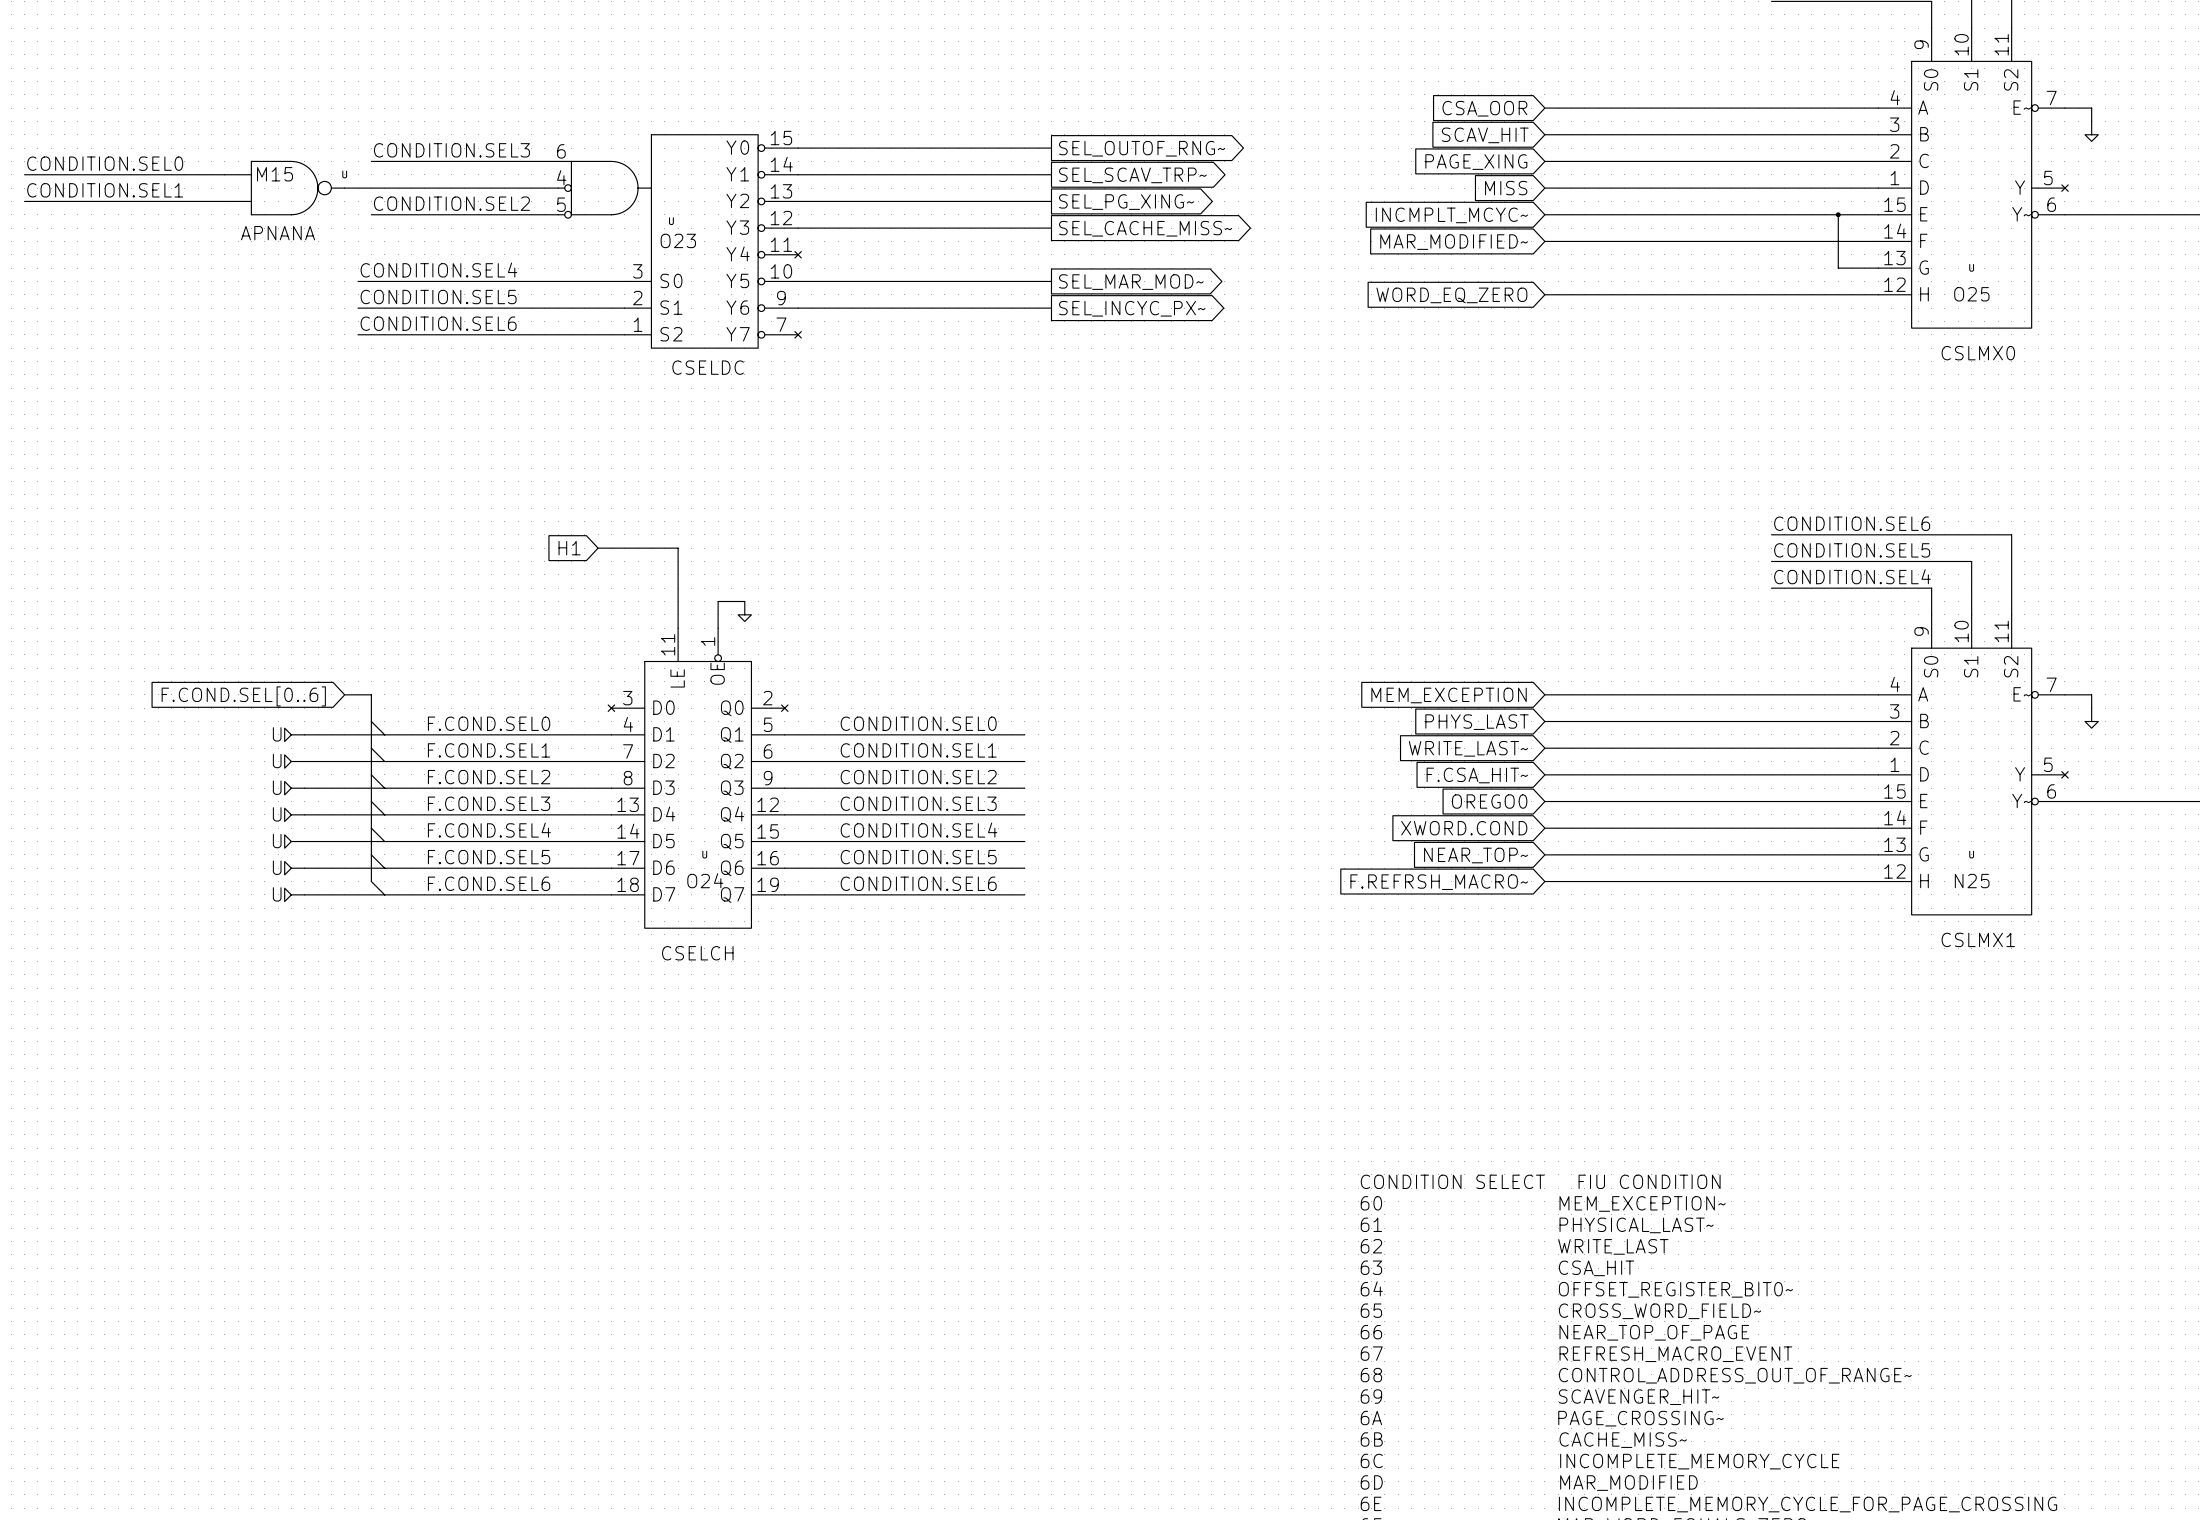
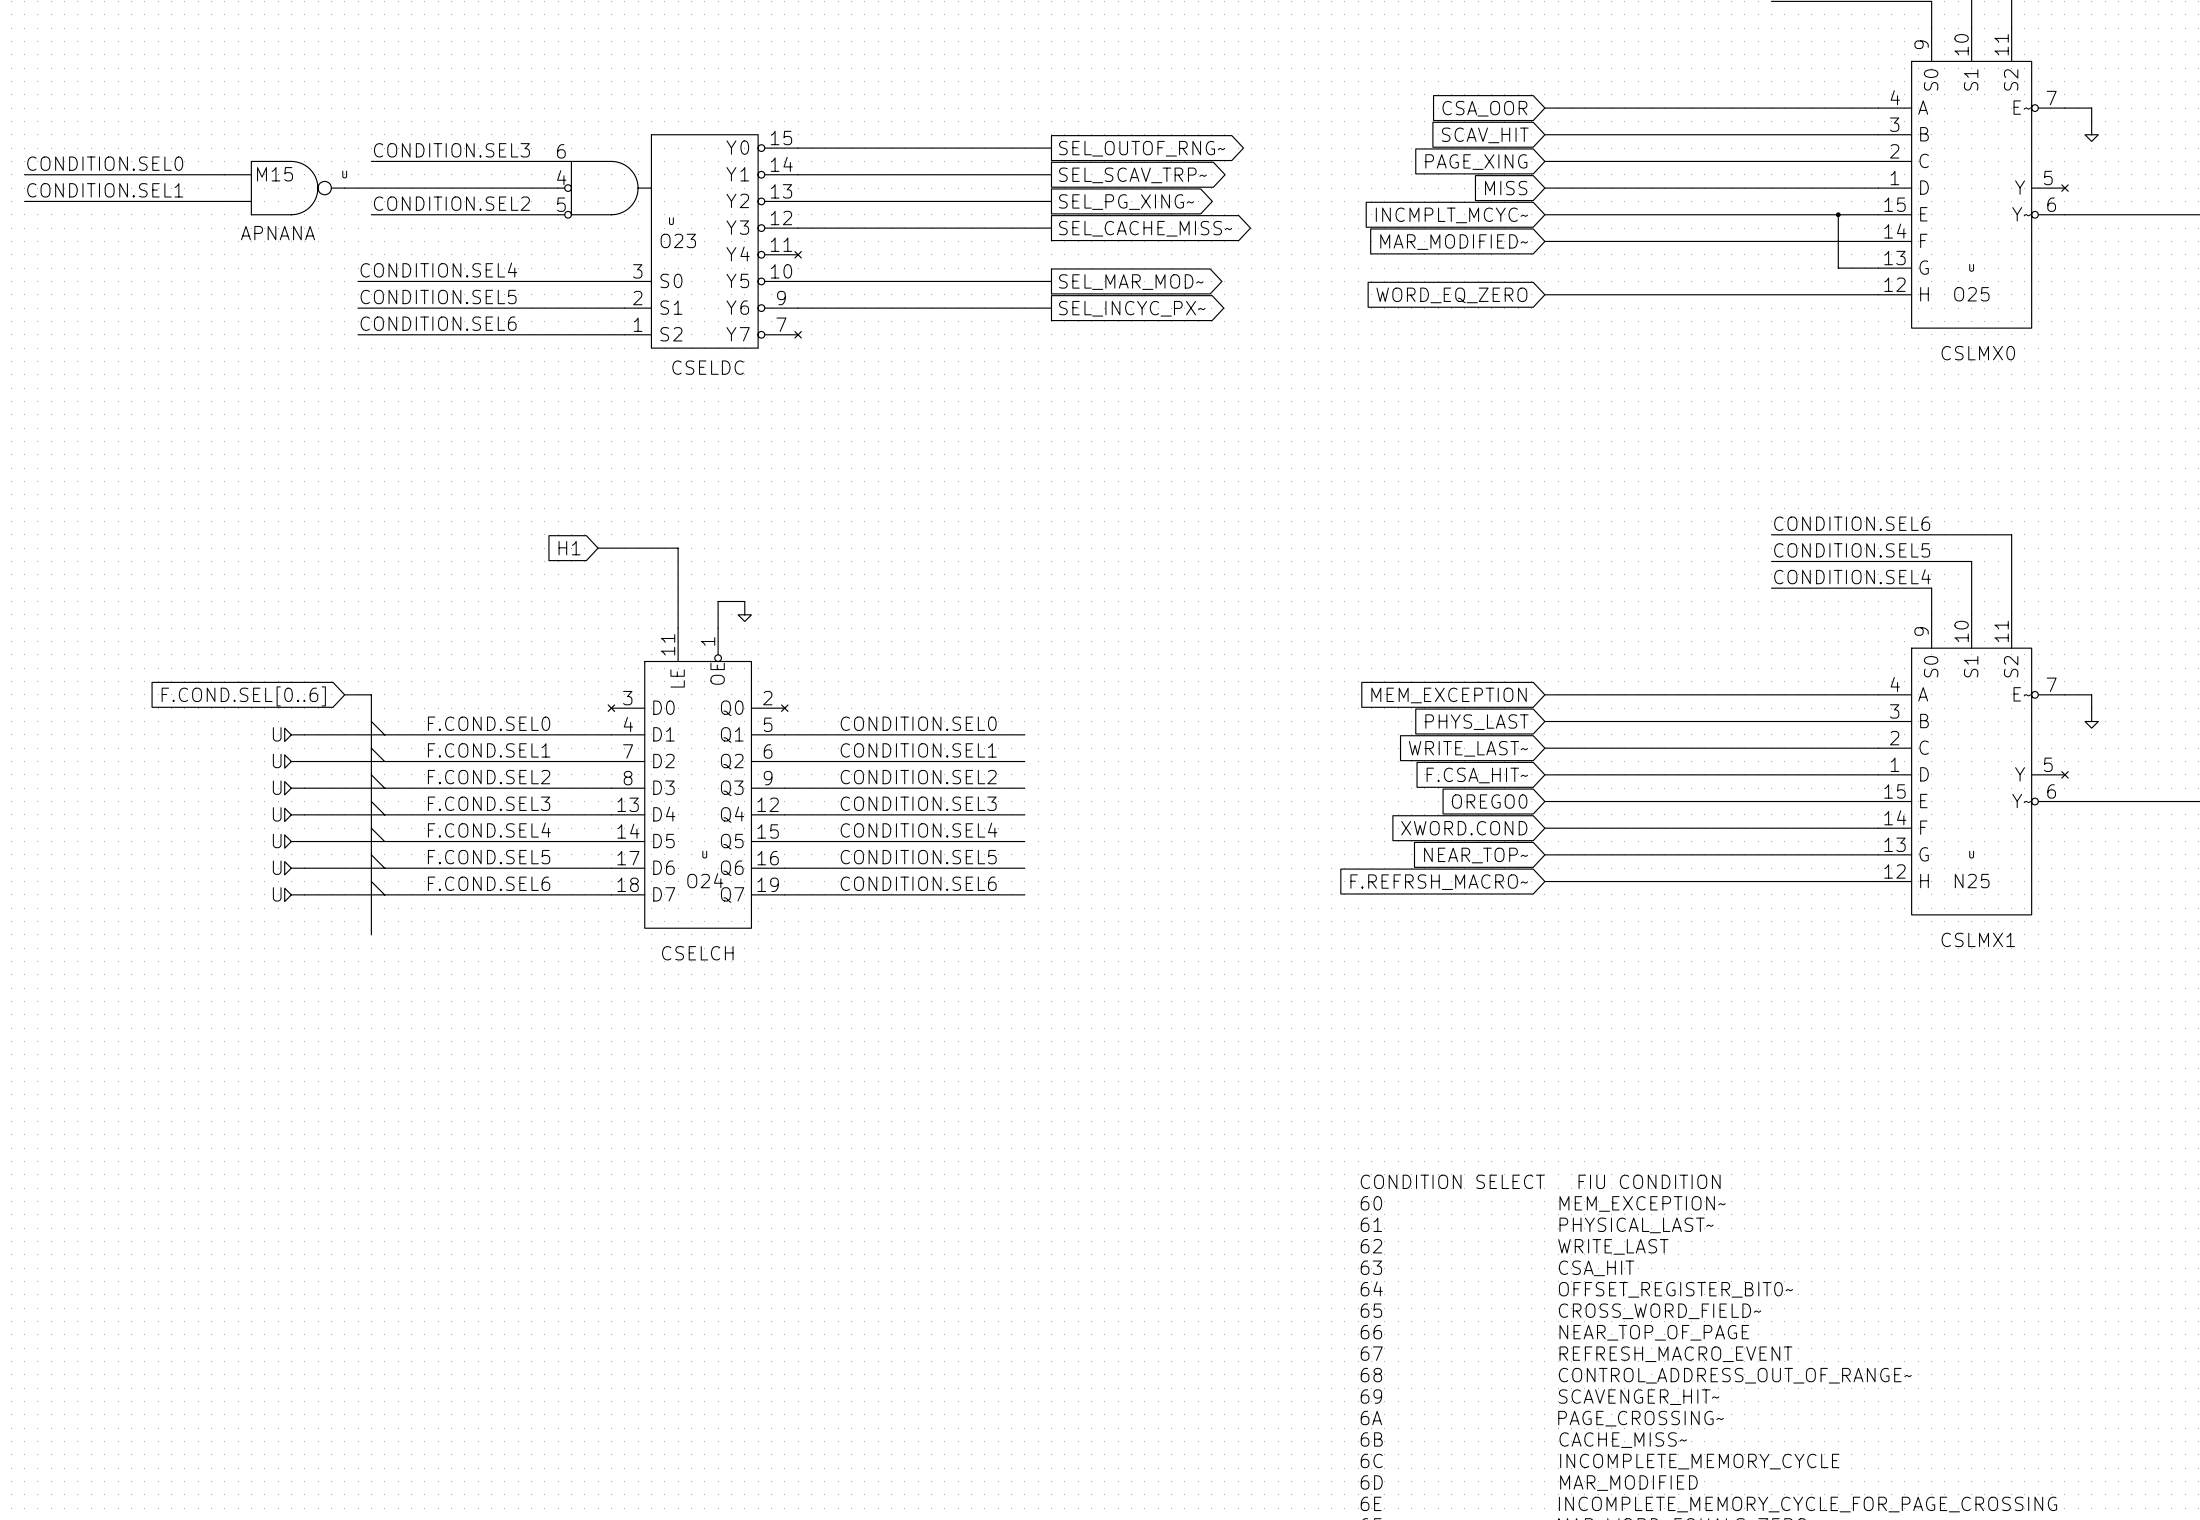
bus: none -> (371, 881) (371, 934)

